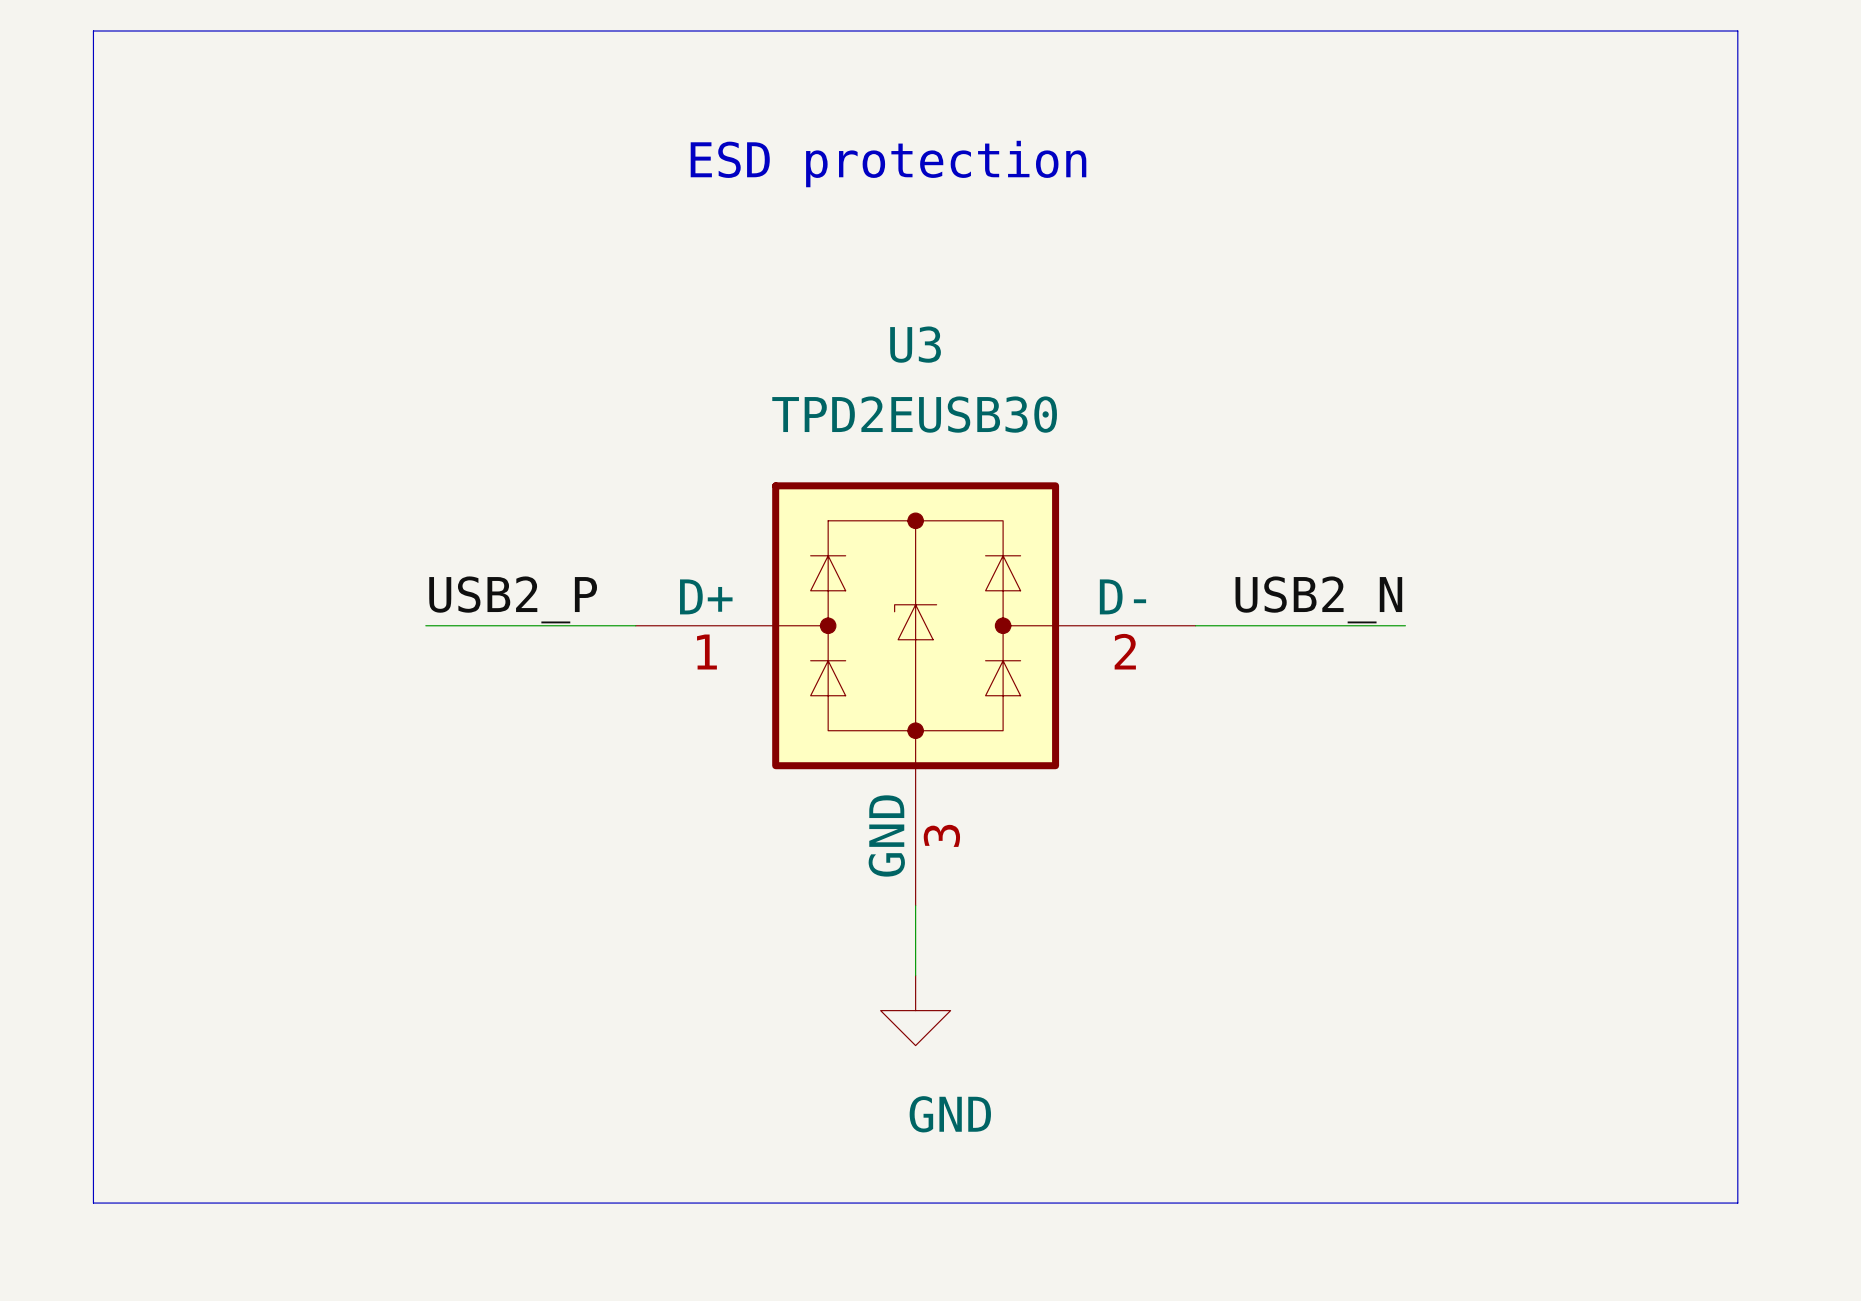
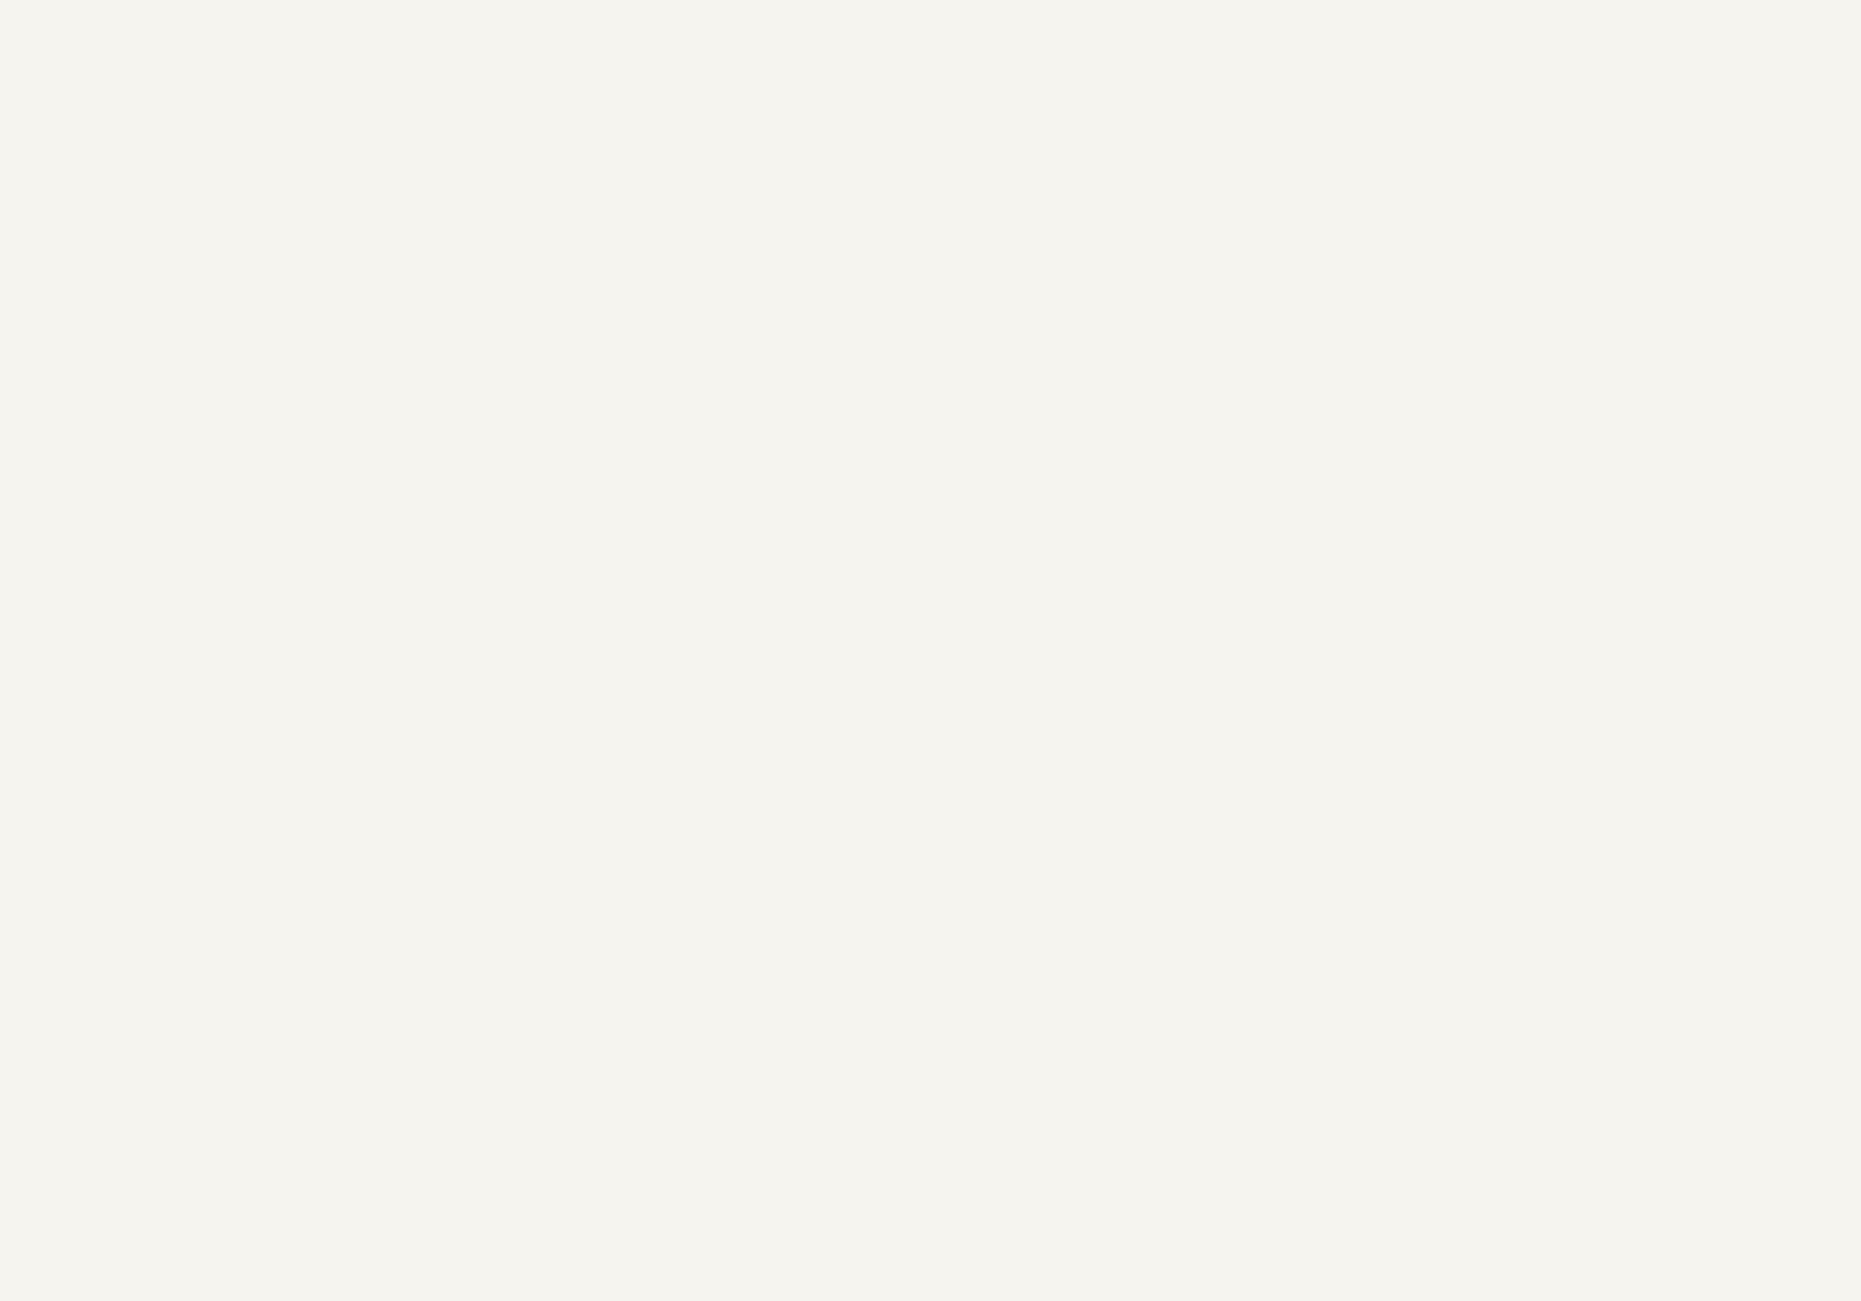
line: (93, 31) (1737, 31) (1737, 1203) (93, 1203) (93, 31) -> none
text: ESD protection (888, 164) -> none
label: USB2_P (513, 599) -> none
label: USB2_N (1318, 599) -> none
wire: (425, 625) (635, 625) -> none
wire: (1195, 625) (1405, 625) -> none
U3: TPD2EUSB30 (915, 693) -> none
wire: (915, 905) (915, 975) -> none
power symbol: GND (915, 1010) -> none

